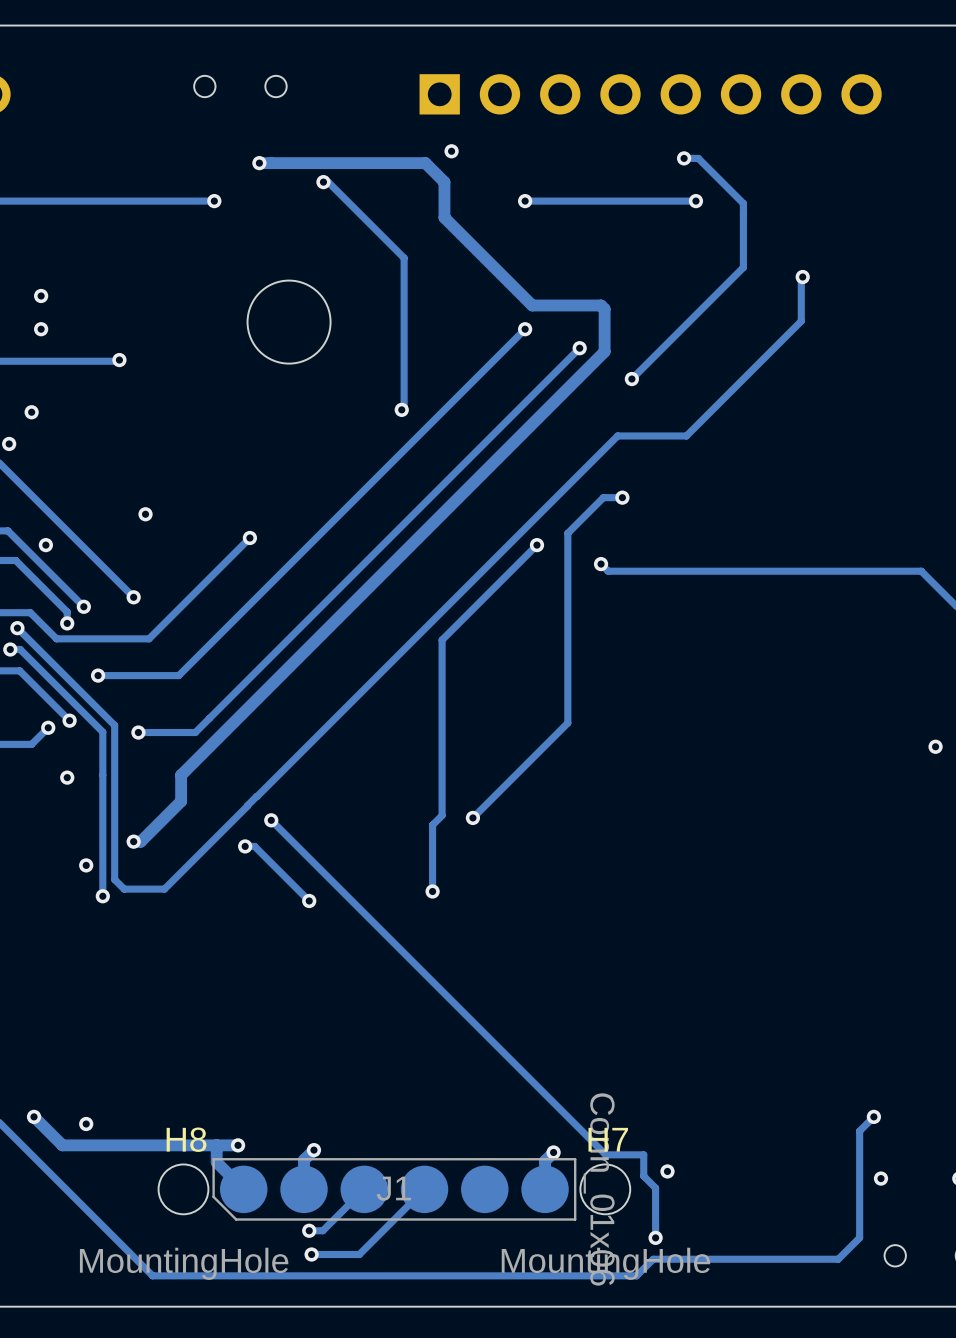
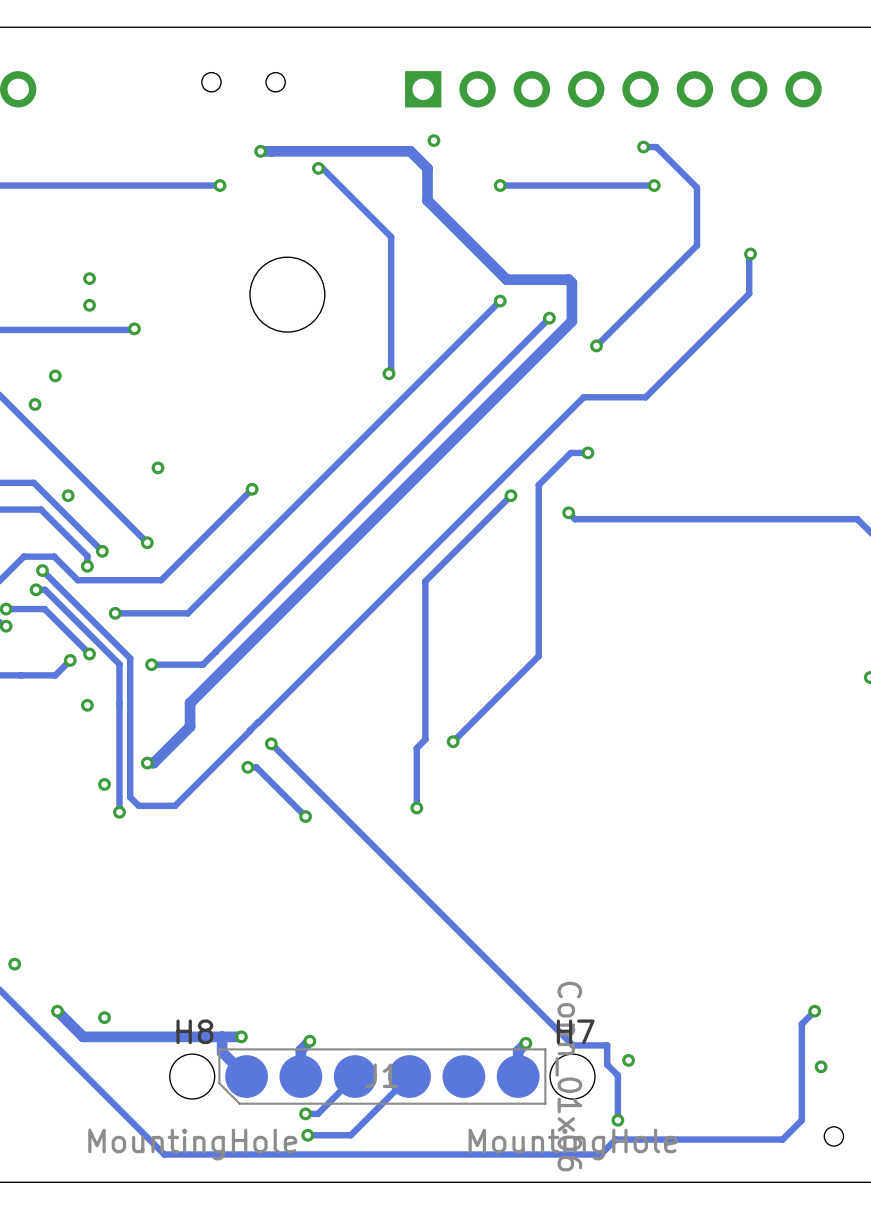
via: (41, 295) -> none
via: none -> (89, 278)
via: (41, 329) -> none
via: none -> (89, 305)

